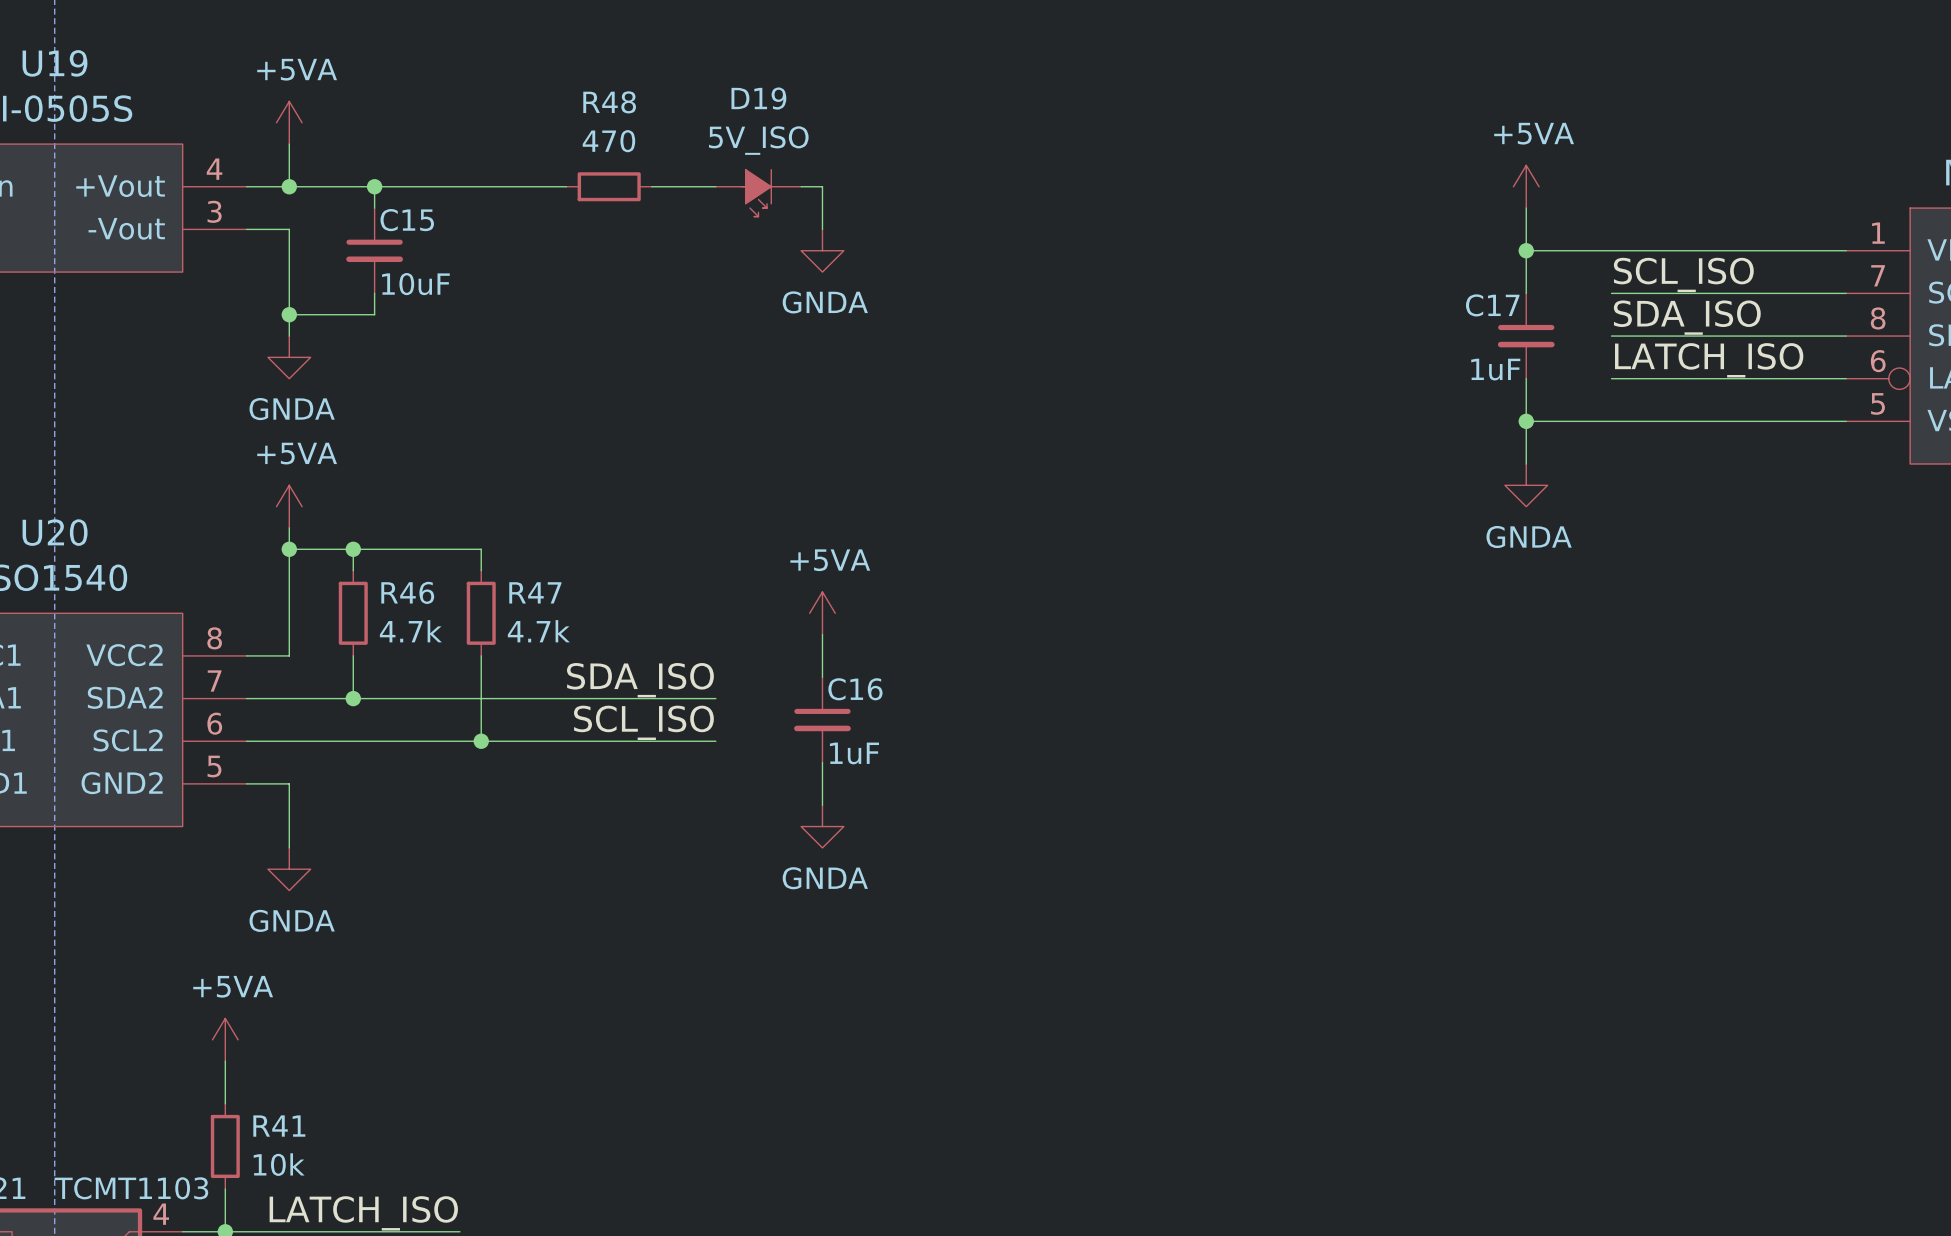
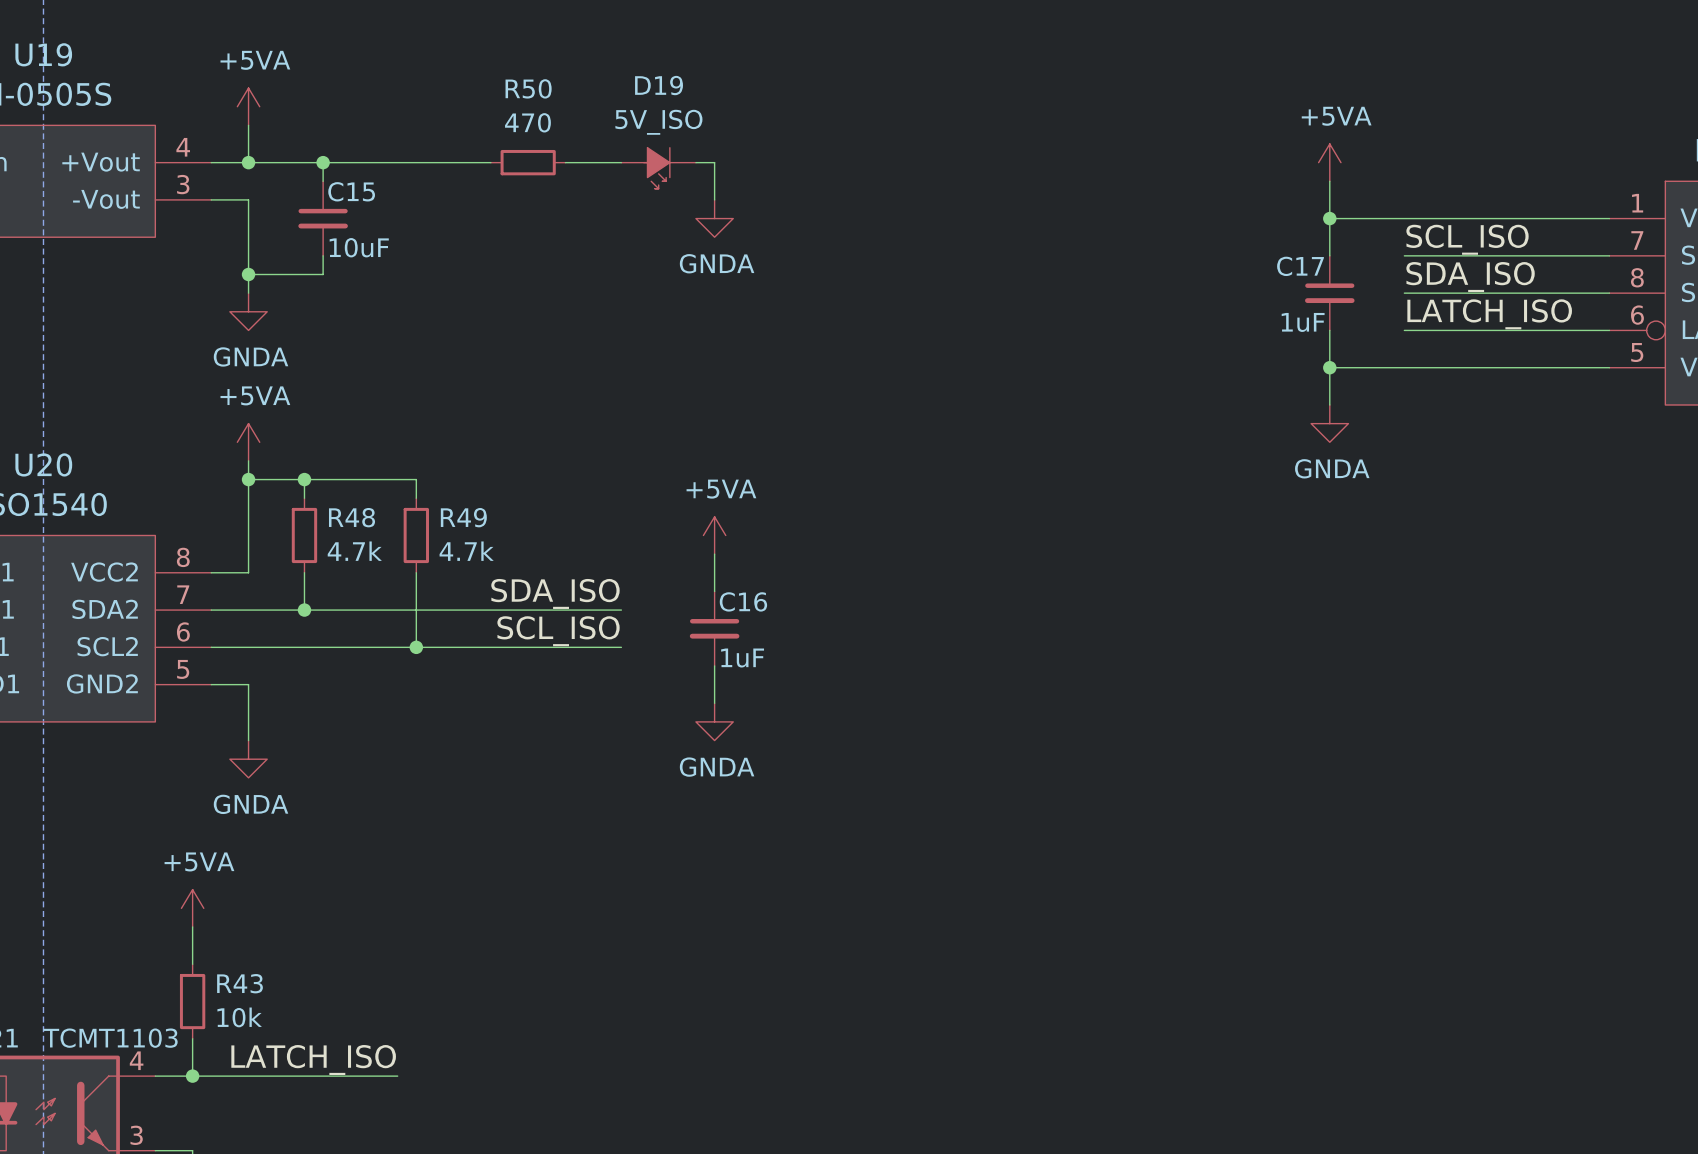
R48 name: R48 (609, 102) -> R50 (528, 88)
R46 name: R46 (407, 592) -> R48 (352, 517)
R47 name: R47 (535, 592) -> R49 (463, 517)
R41 name: R41 (279, 1126) -> R43 (240, 983)

